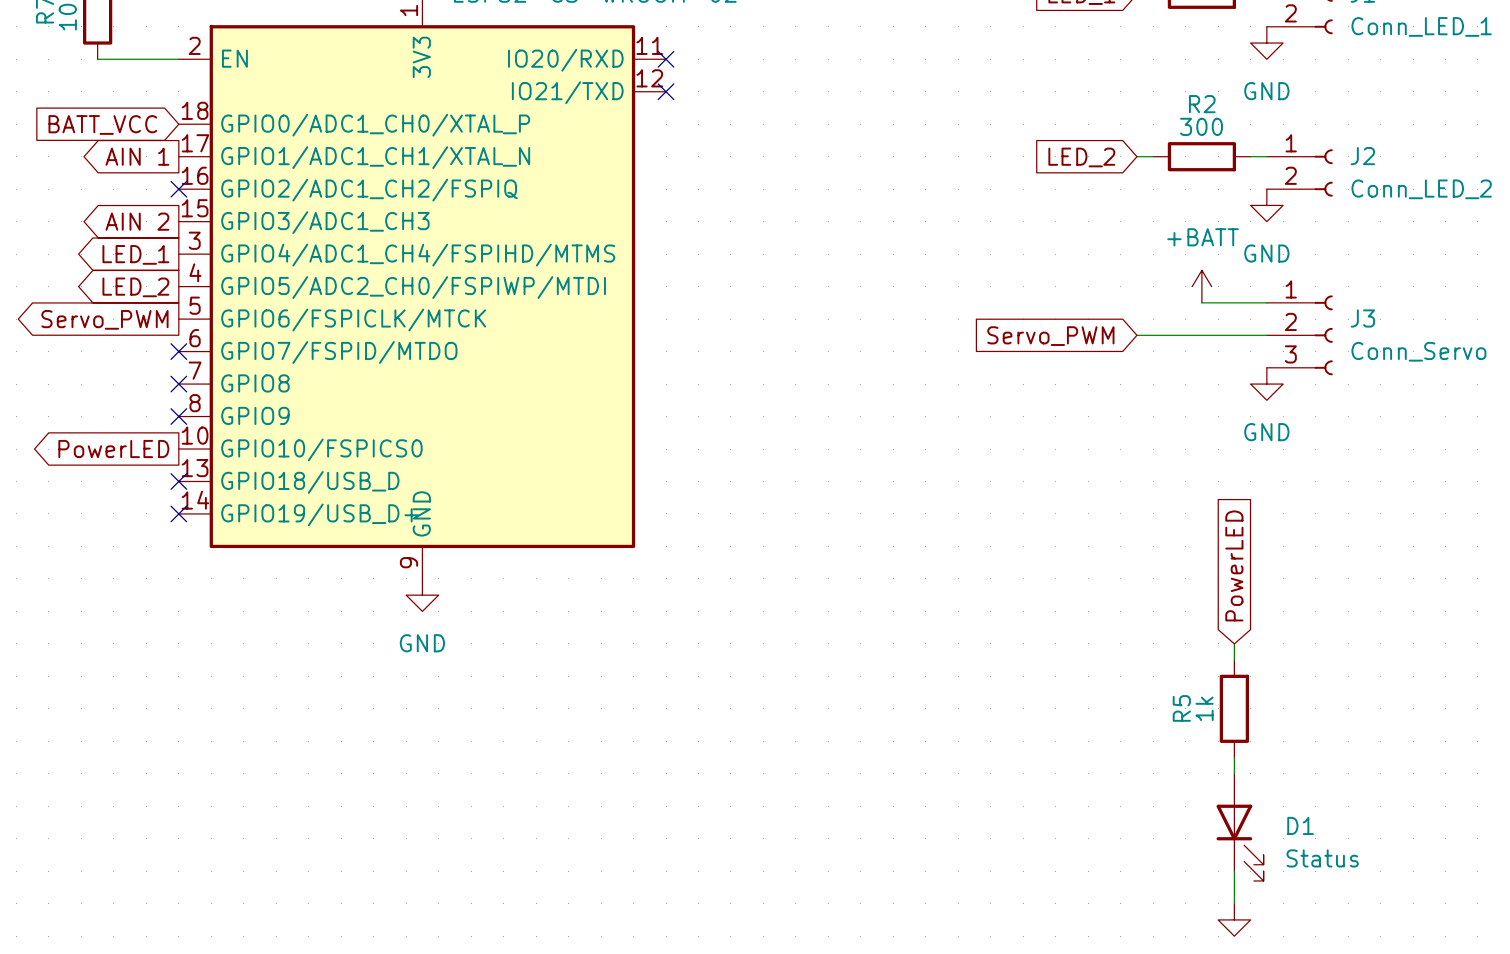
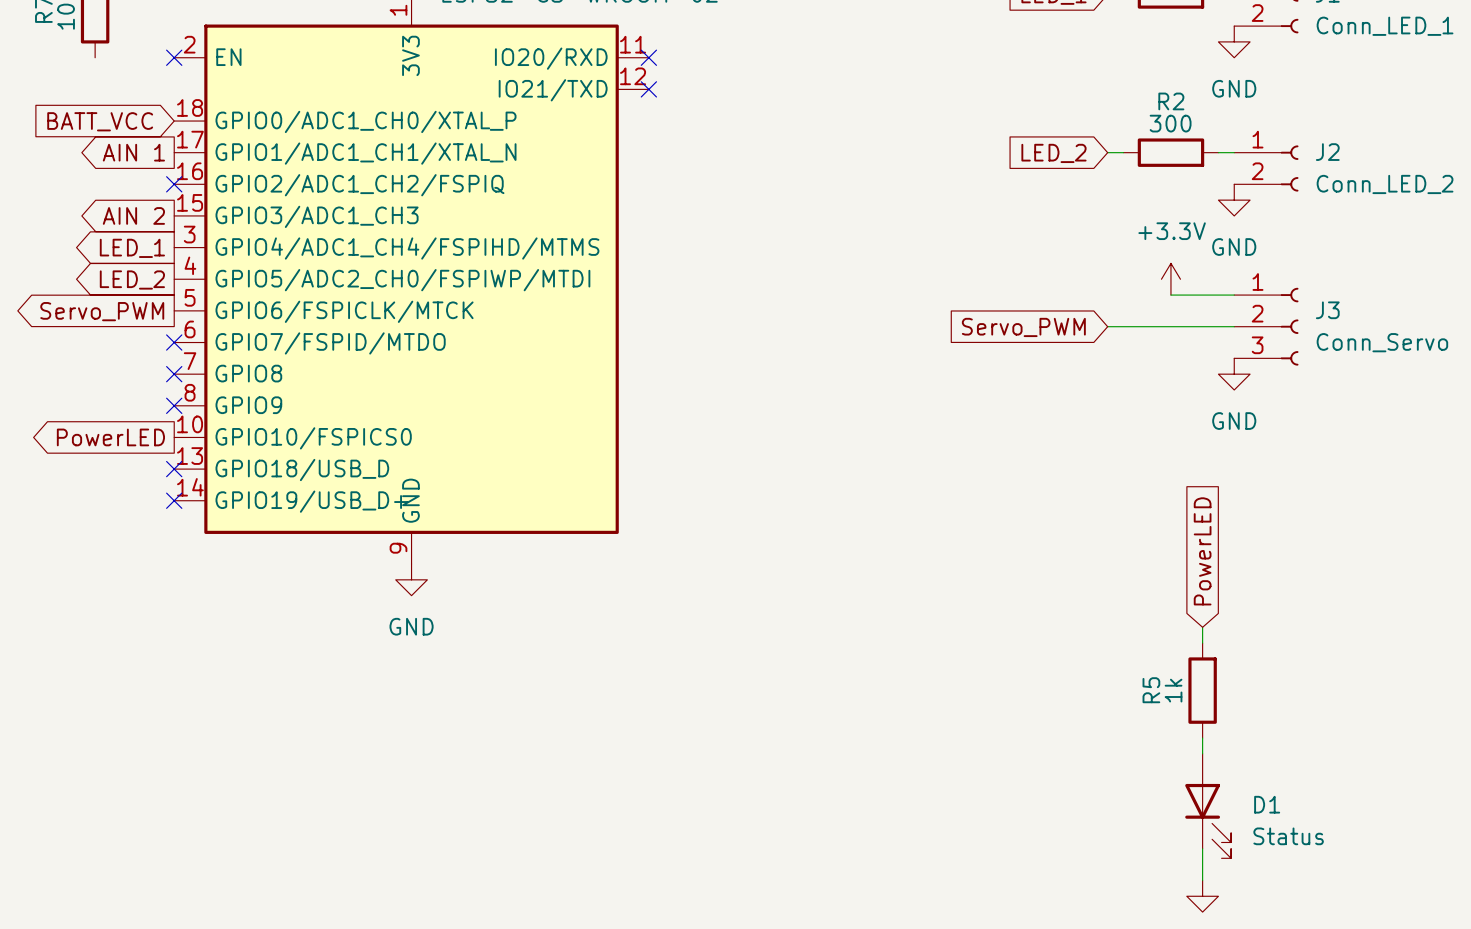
wire: (97, 59) (178, 59) -> none
no-connect mark: none -> (174, 57)
power symbol: +BATT (1201, 286) -> +3.3V (1170, 279)

